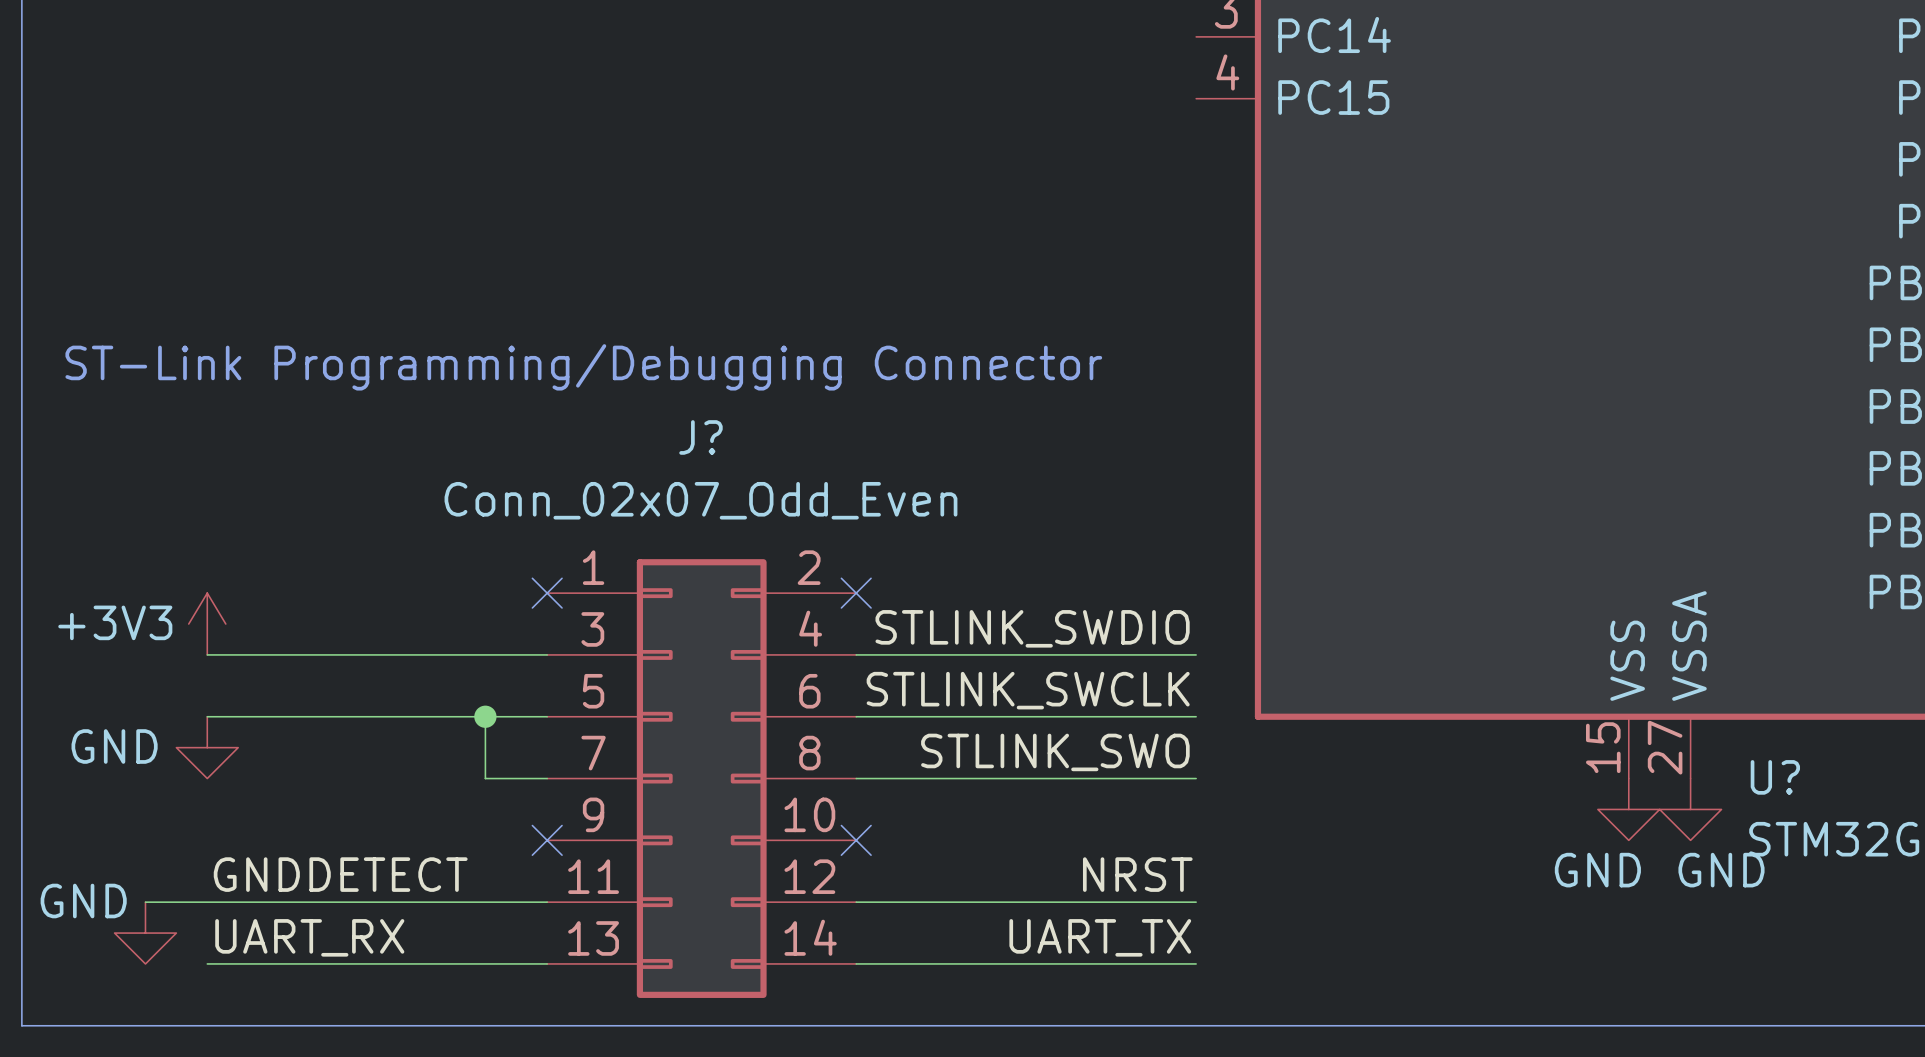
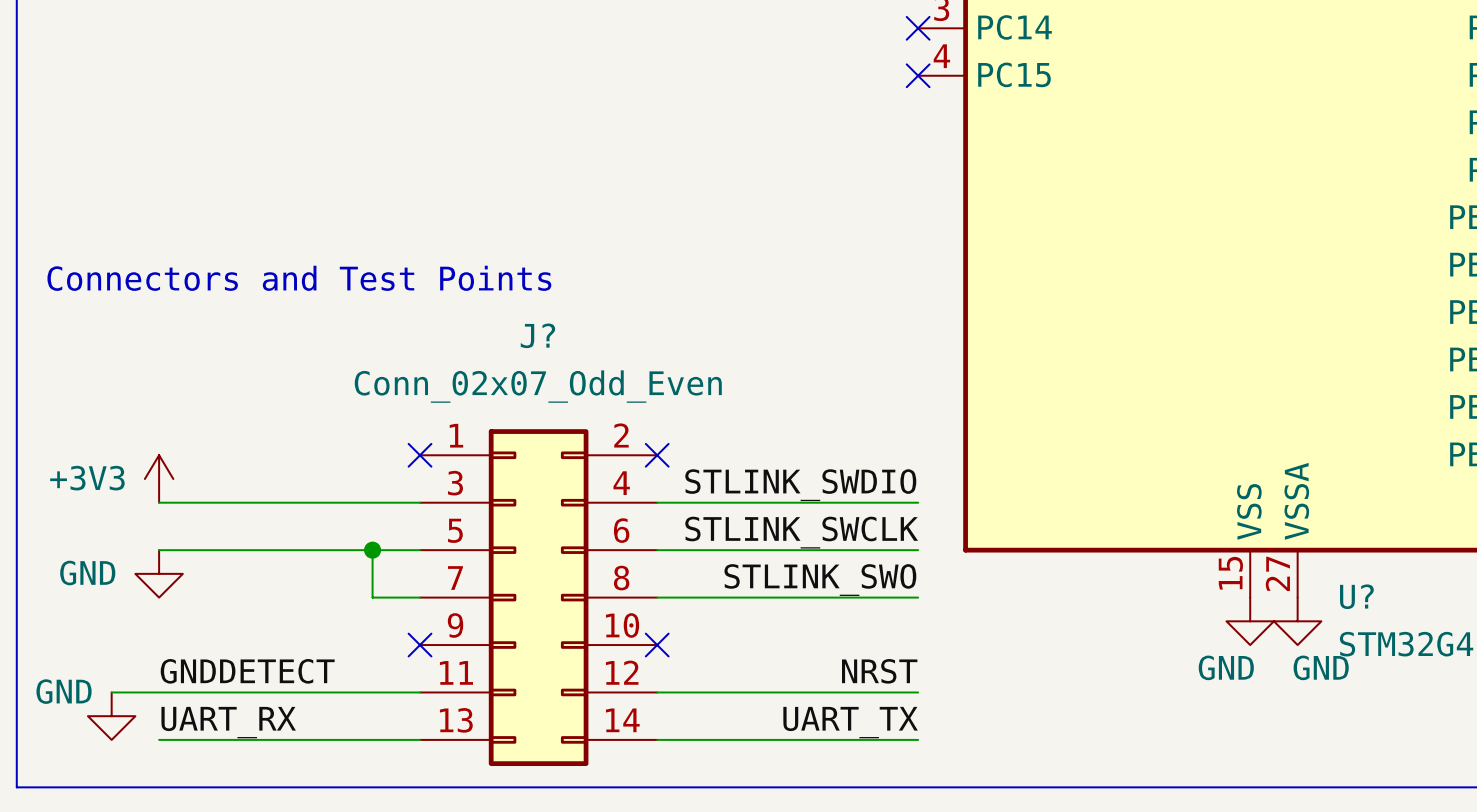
no-connect mark: none -> (918, 28)
no-connect mark: none -> (918, 75)
text: ST-Link Programming/Debugging Connector (583, 367) -> Connectors and Test Points (299, 278)

